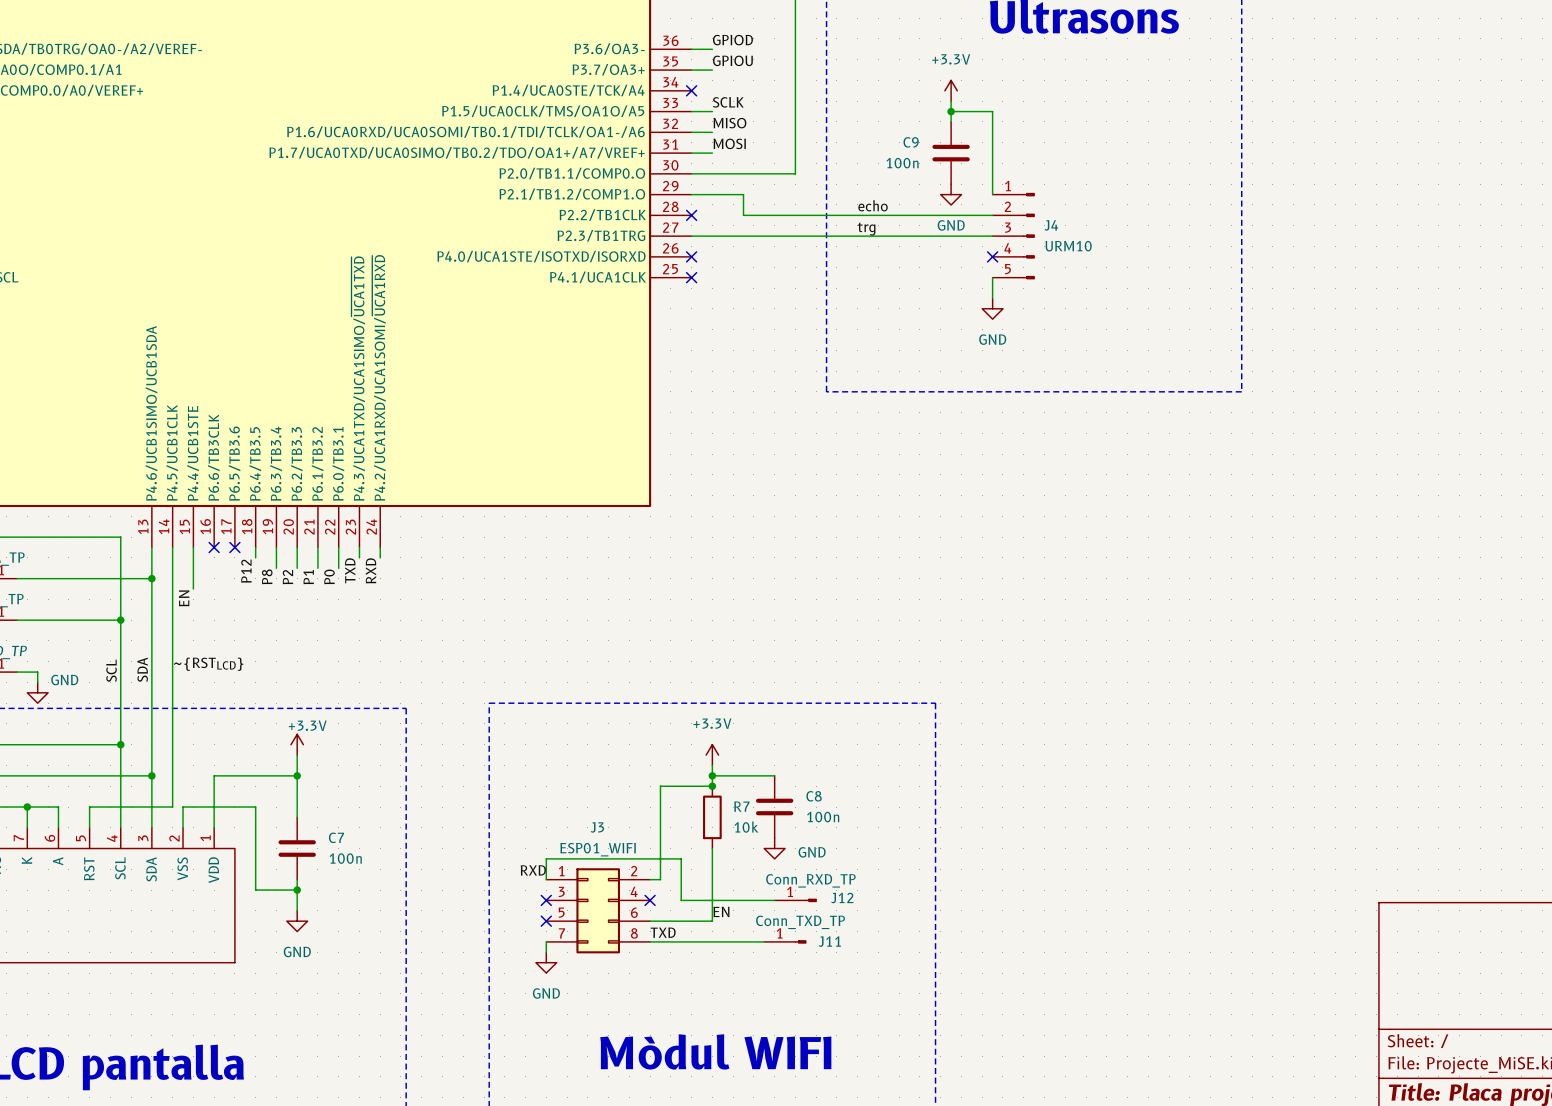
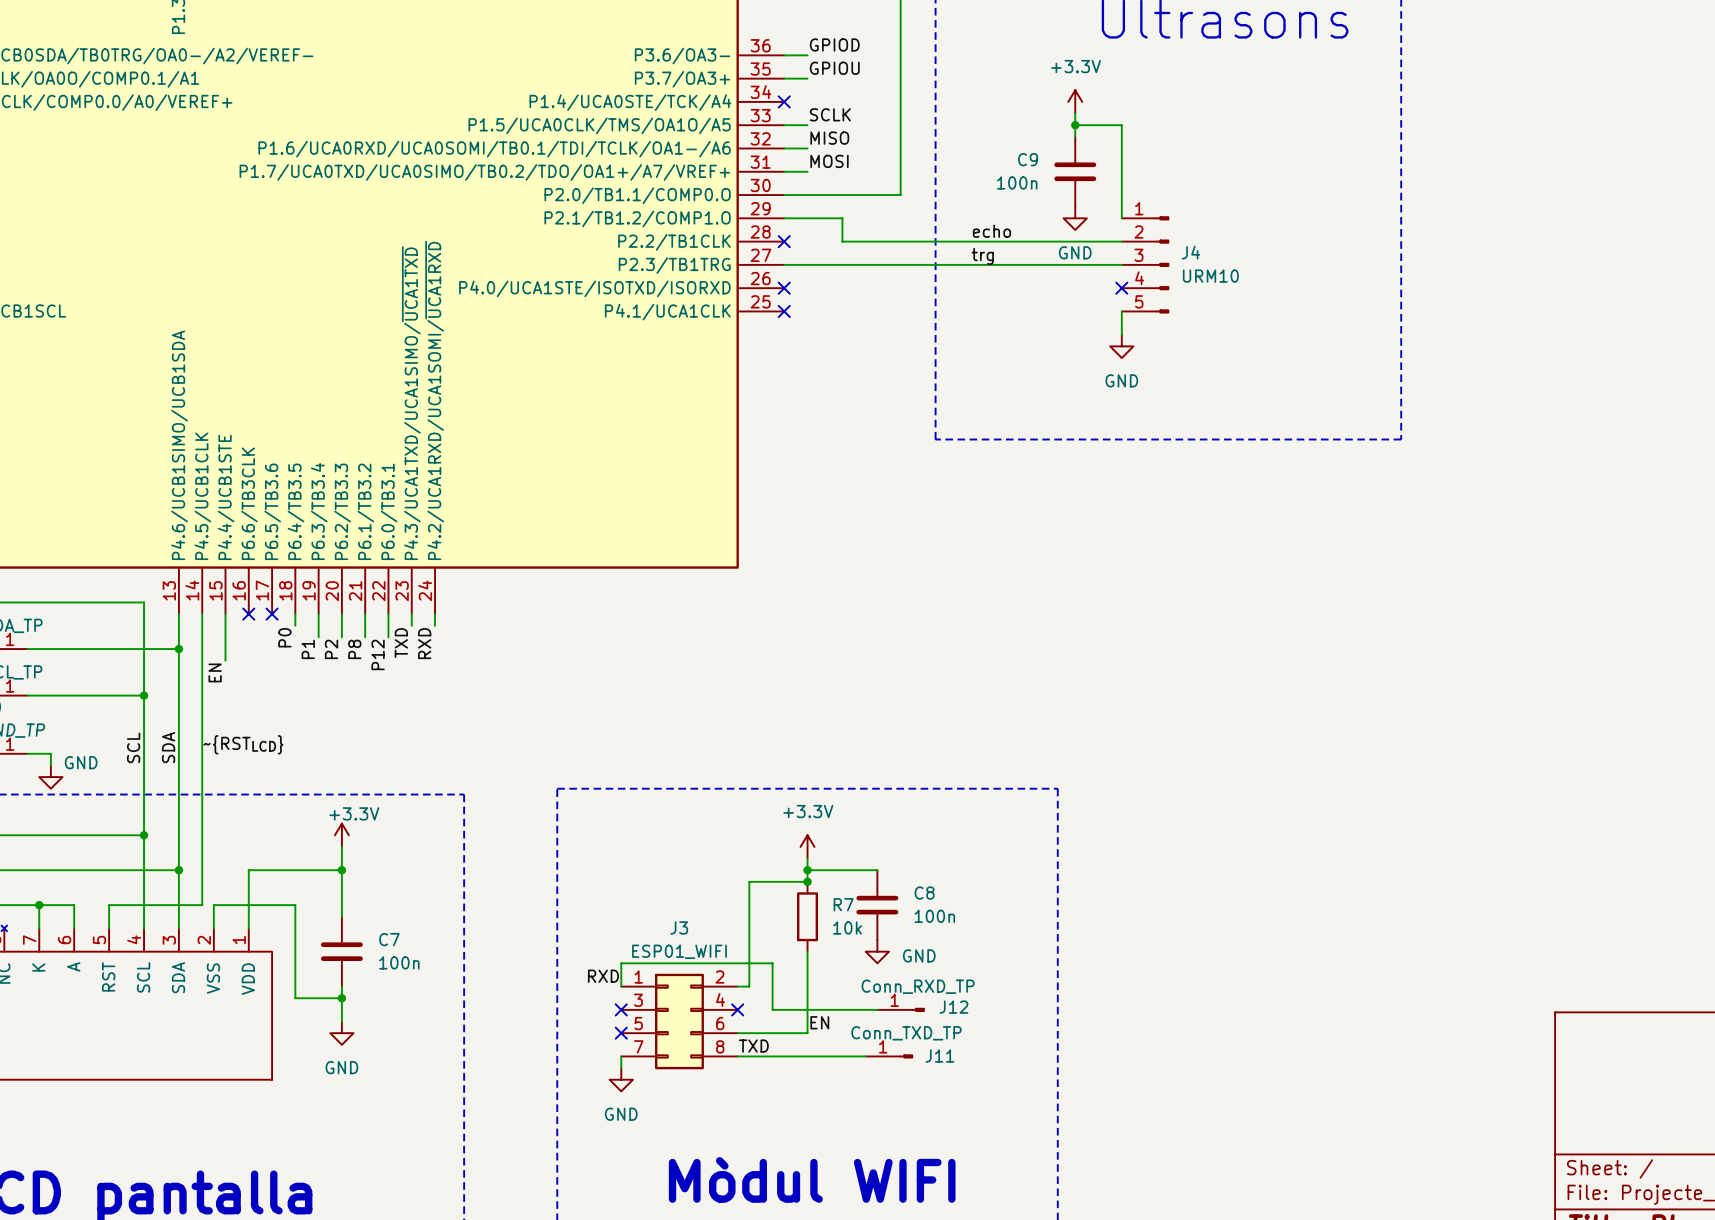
label: P12 (246, 571) -> P0 (284, 637)
label: P8 (267, 576) -> P1 (308, 649)
label: P0 (329, 576) -> P12 (378, 654)
label: P1 (308, 577) -> P8 (354, 649)

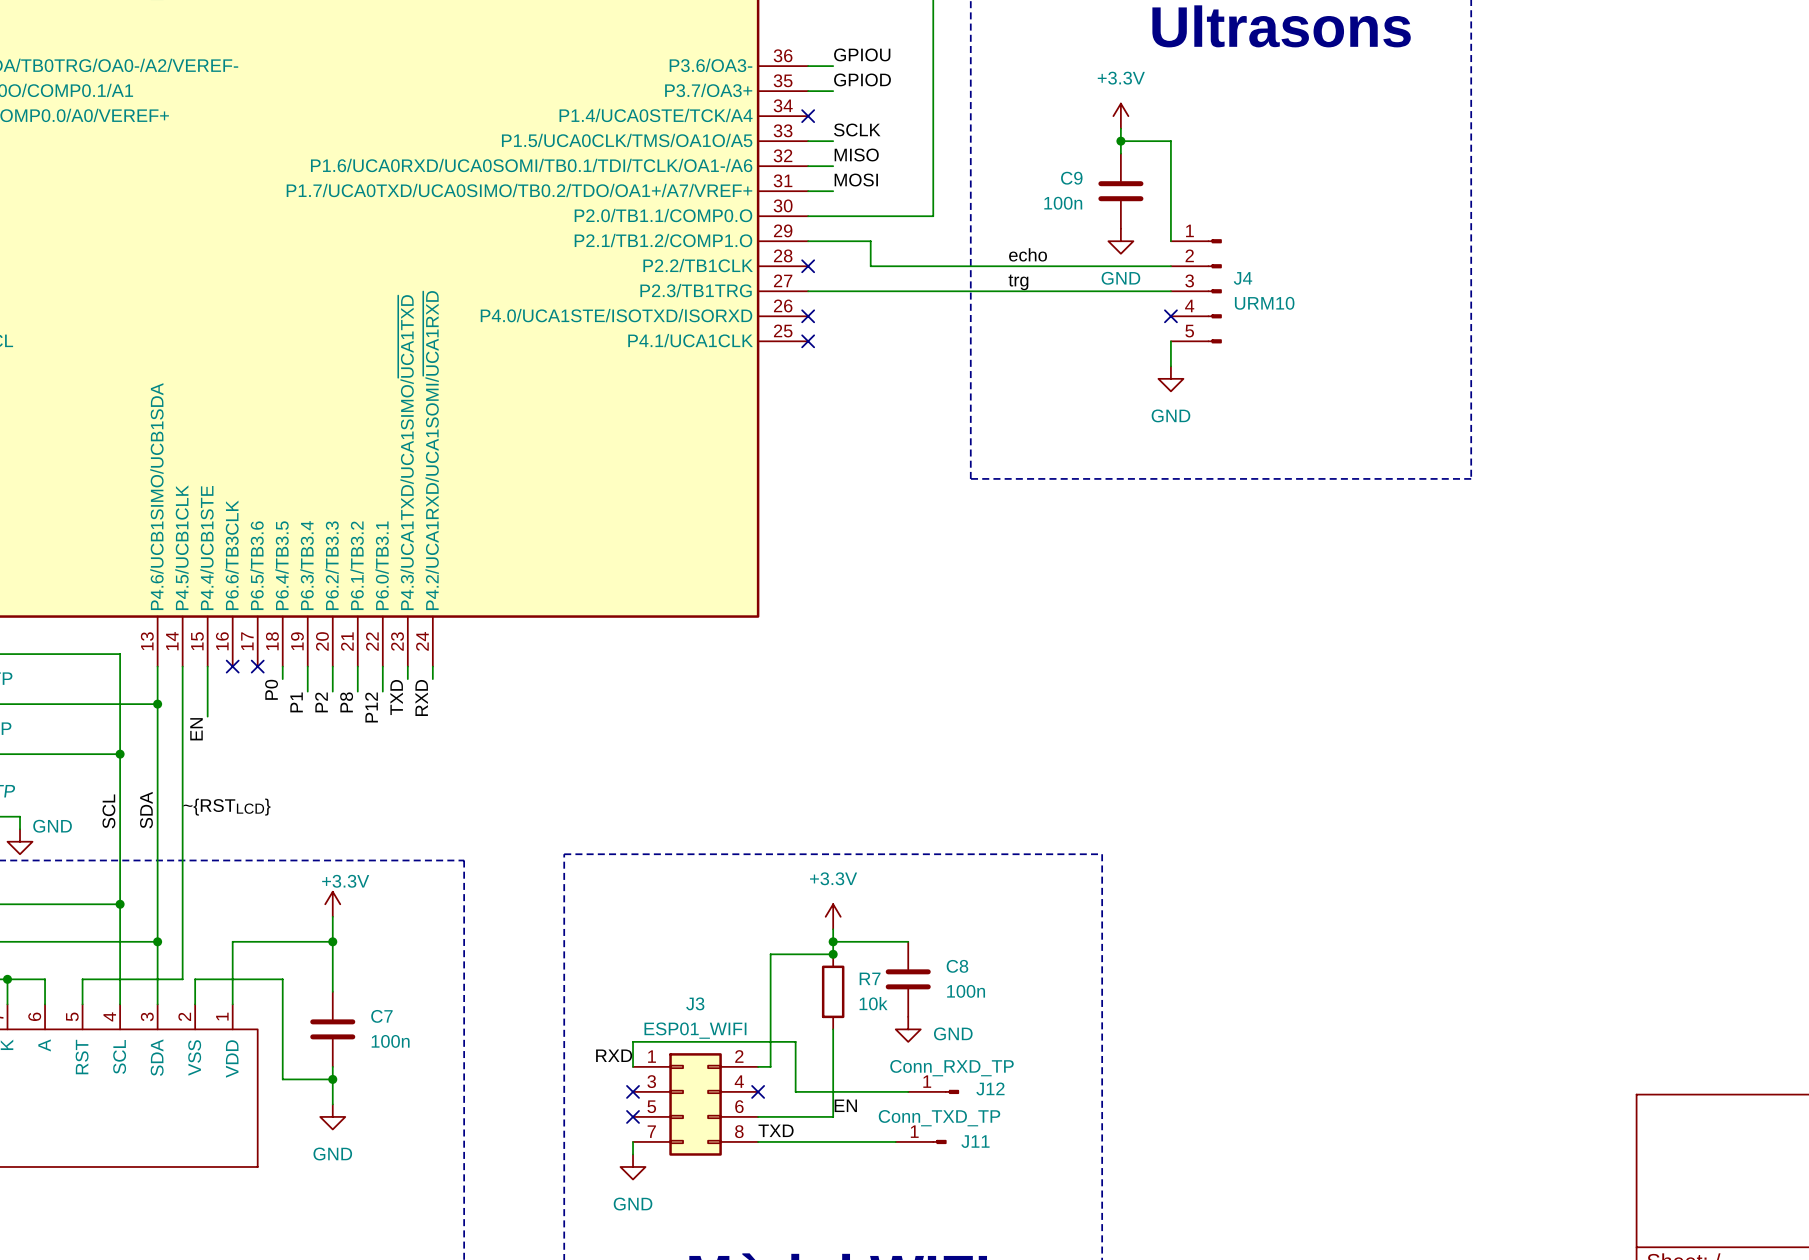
label: GPIOD (834, 44) -> GPIOU (862, 54)
label: GPIOU (834, 68) -> GPIOD (862, 79)

